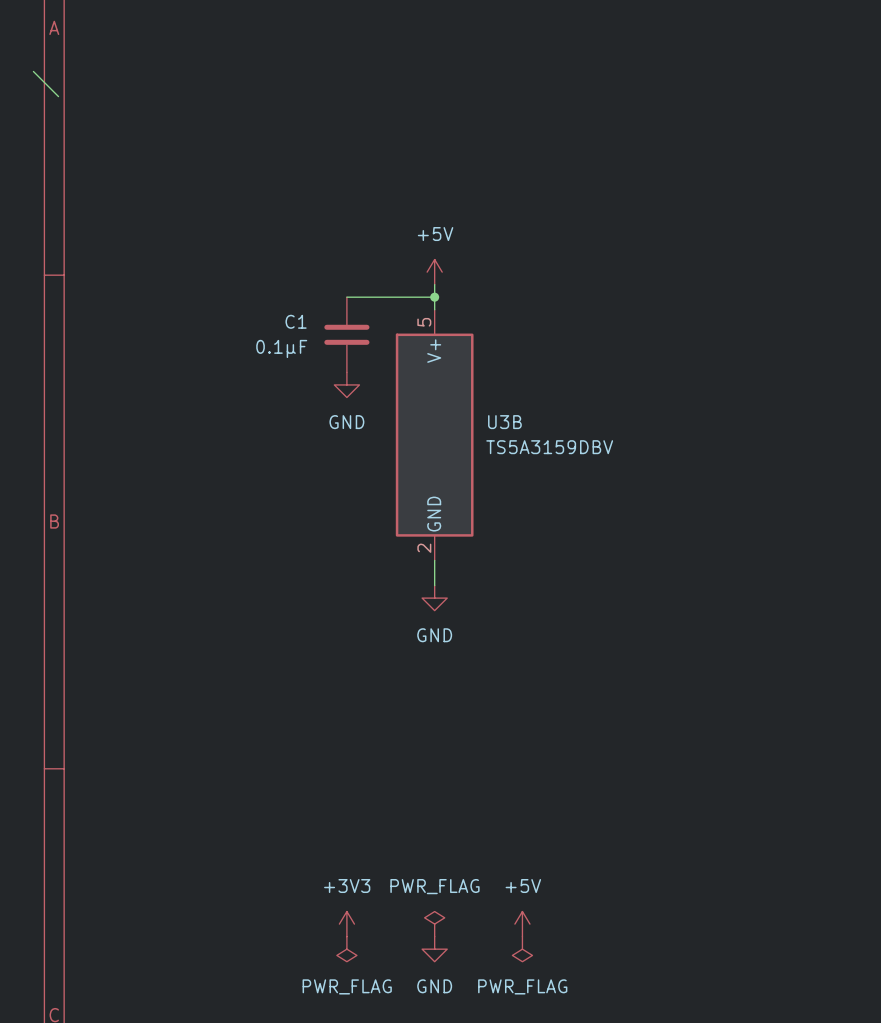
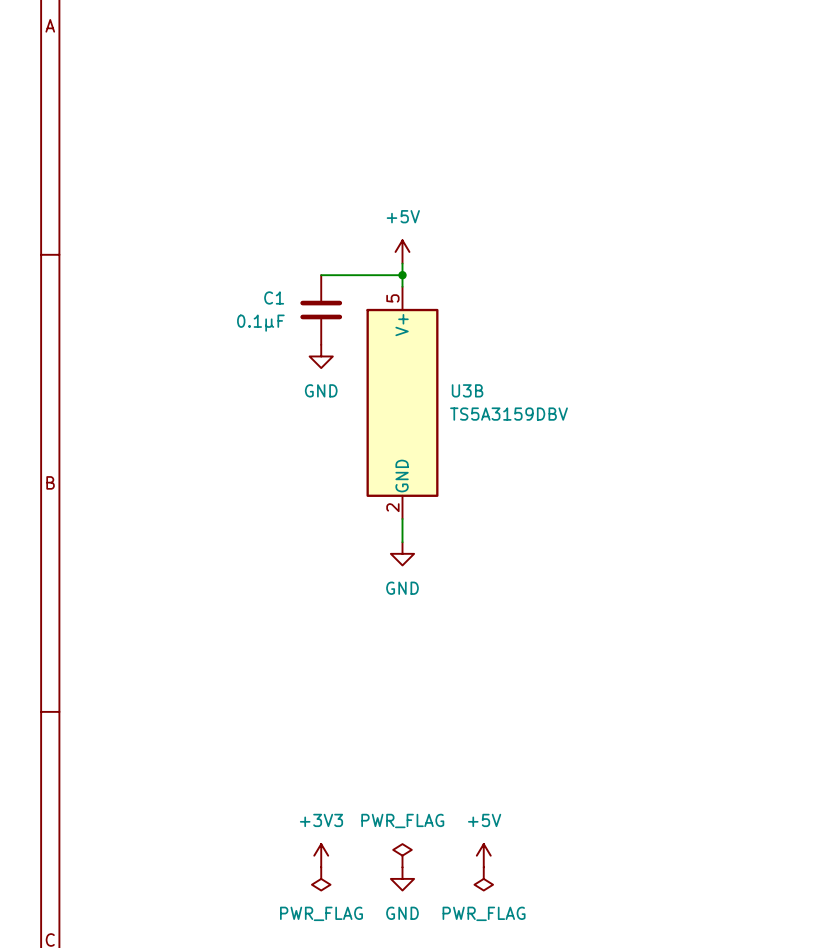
wire: (33, 71) (58, 96) -> none

